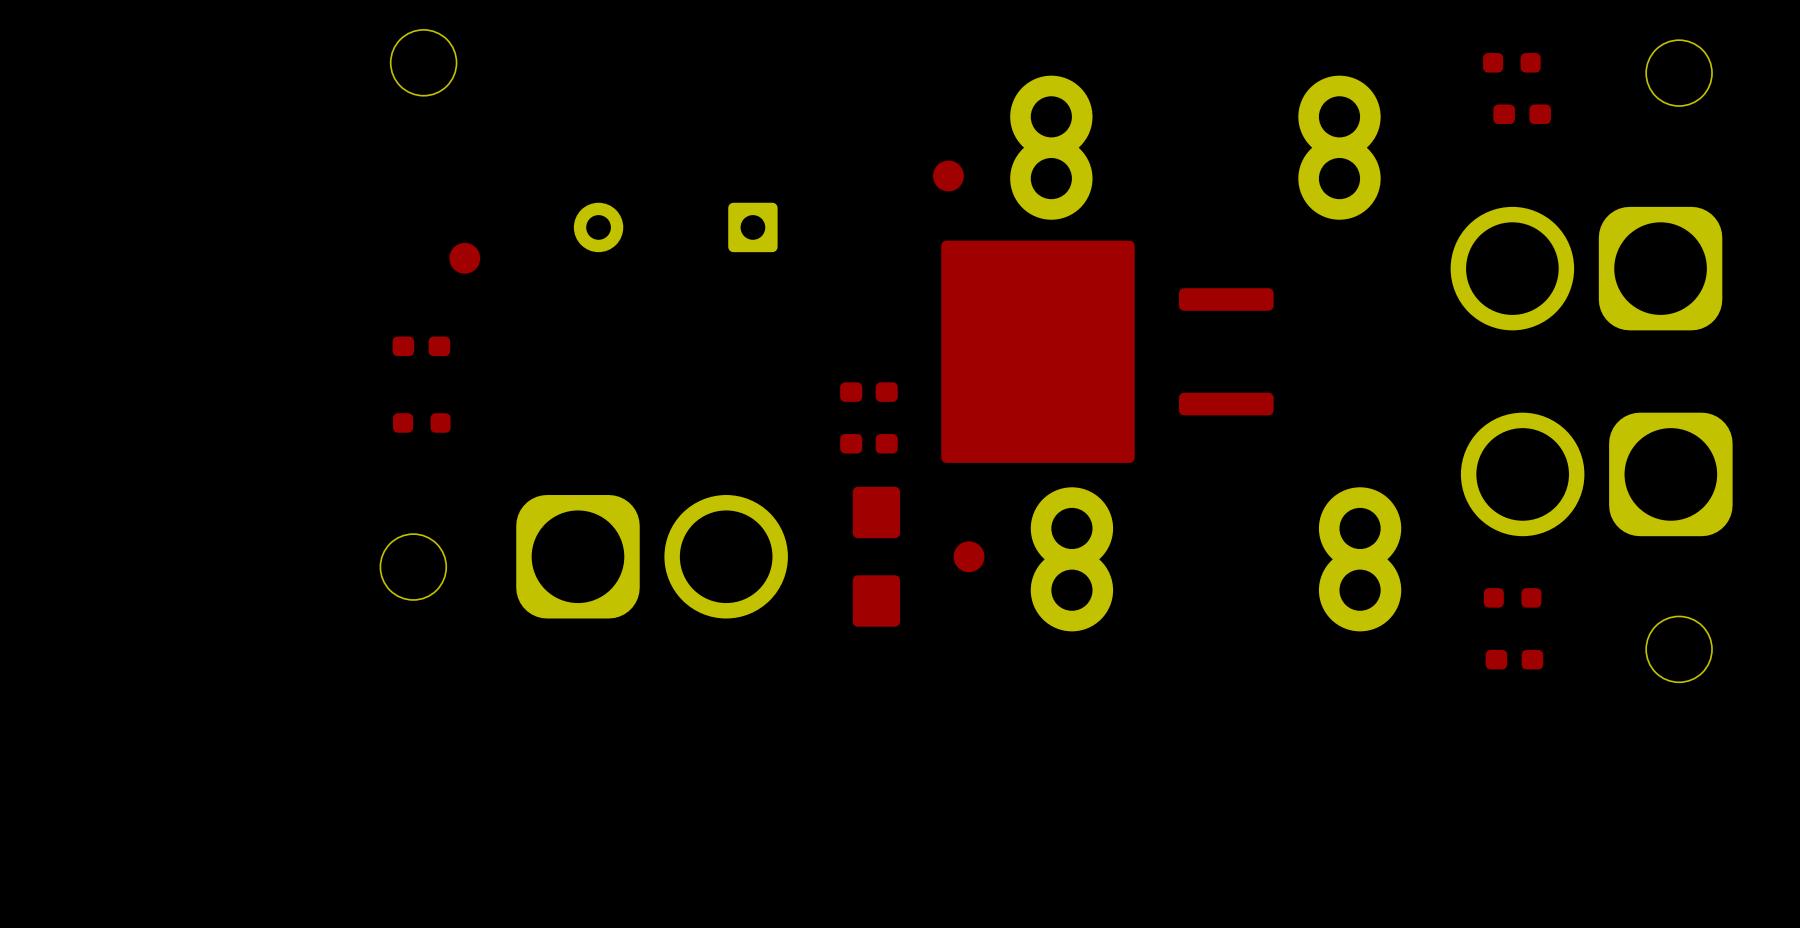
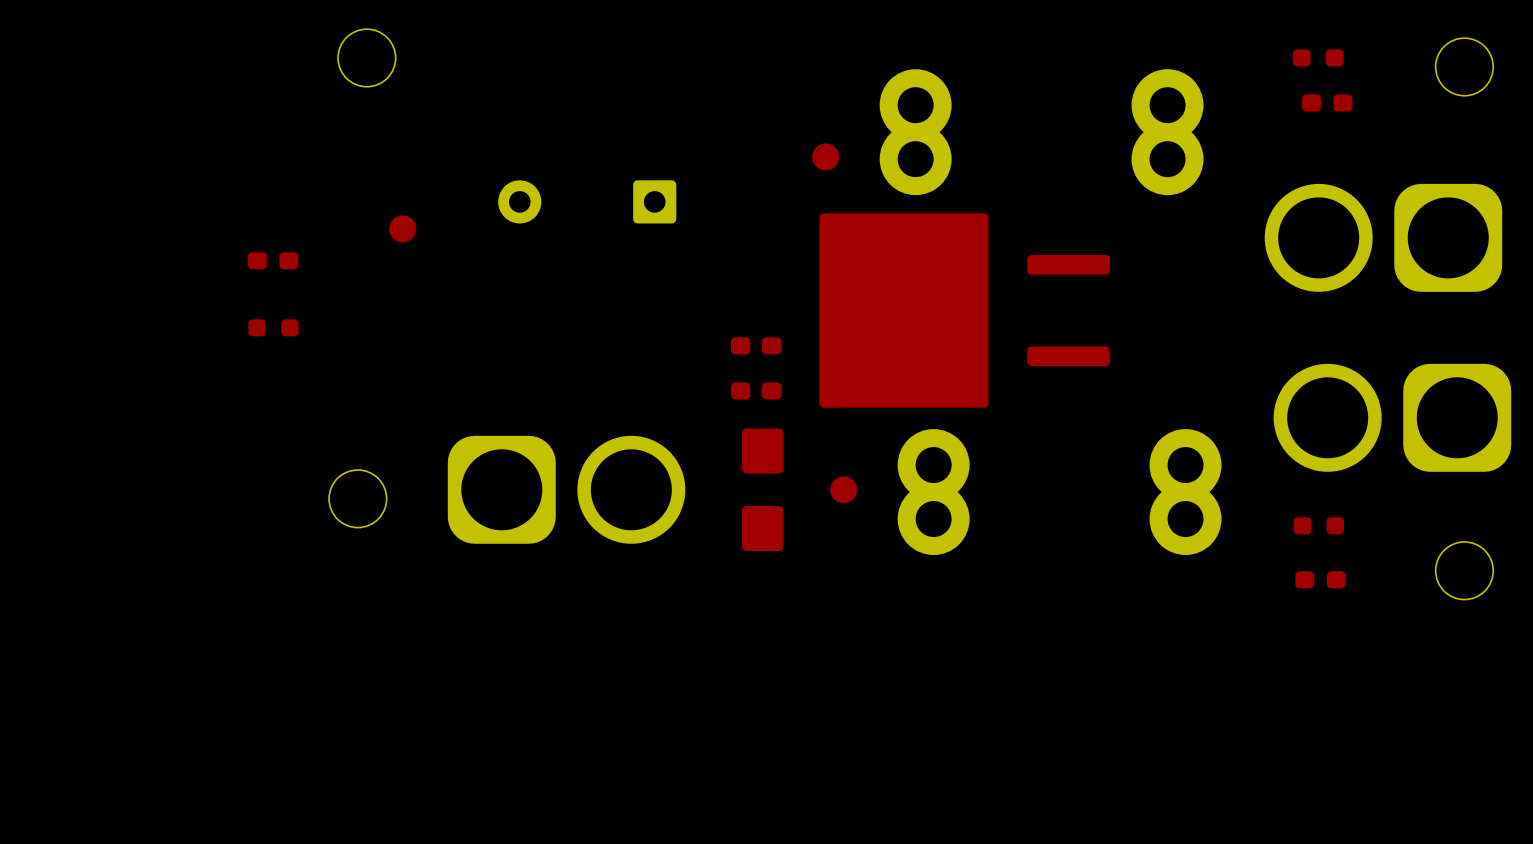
part position: (421, 346) -> (273, 260)
part position: (421, 422) -> (273, 327)

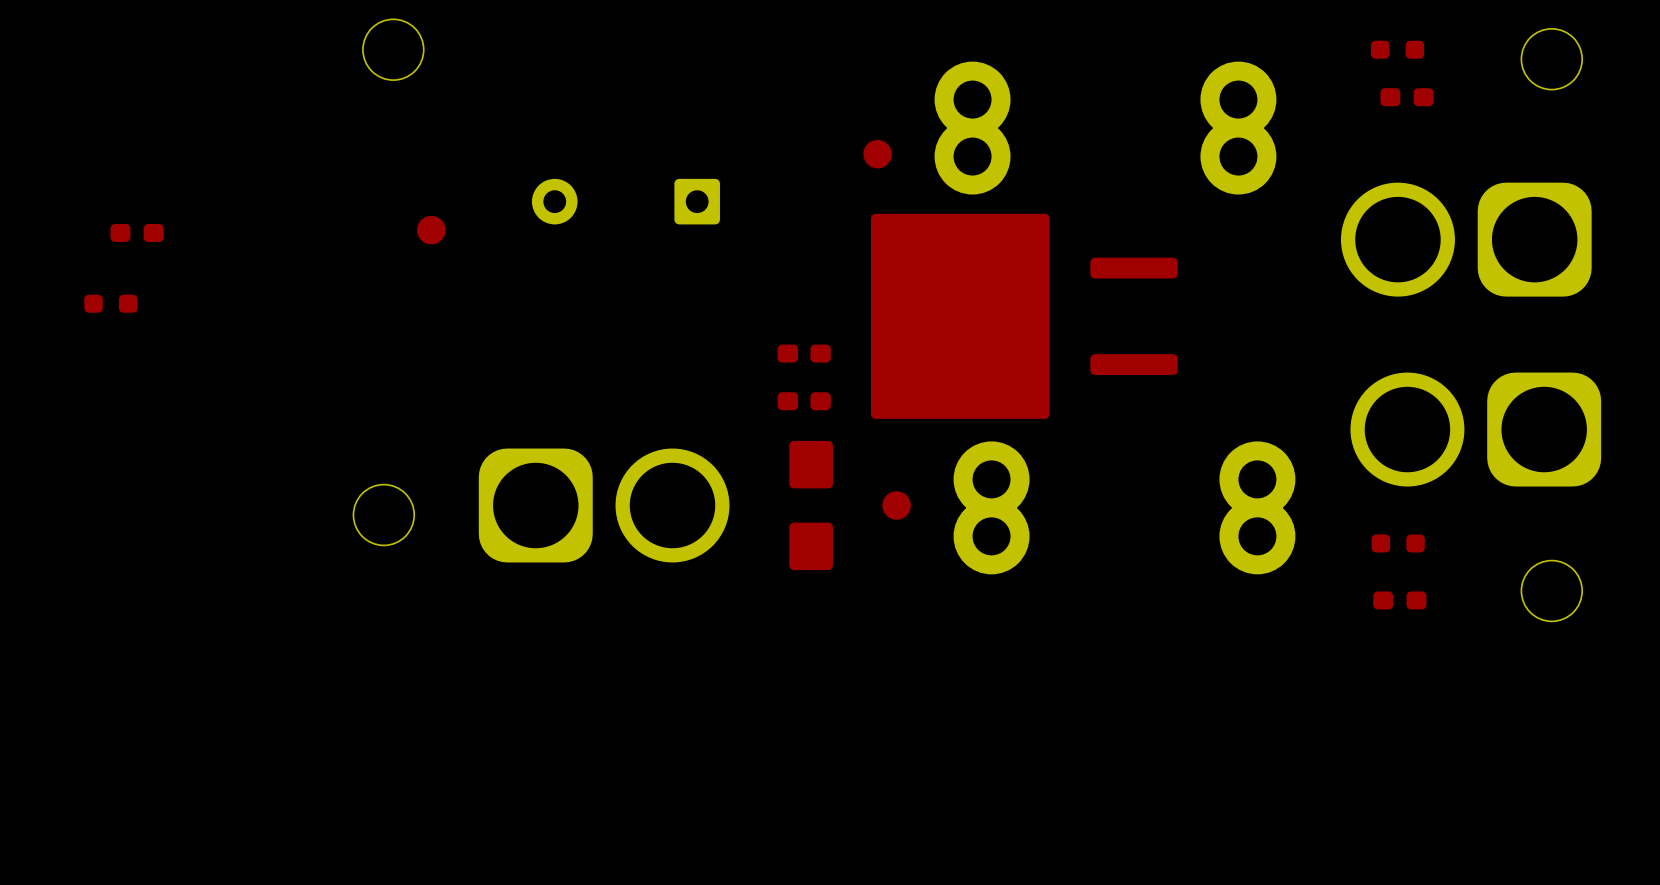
part position: (273, 260) -> (137, 232)
part position: (273, 327) -> (110, 303)

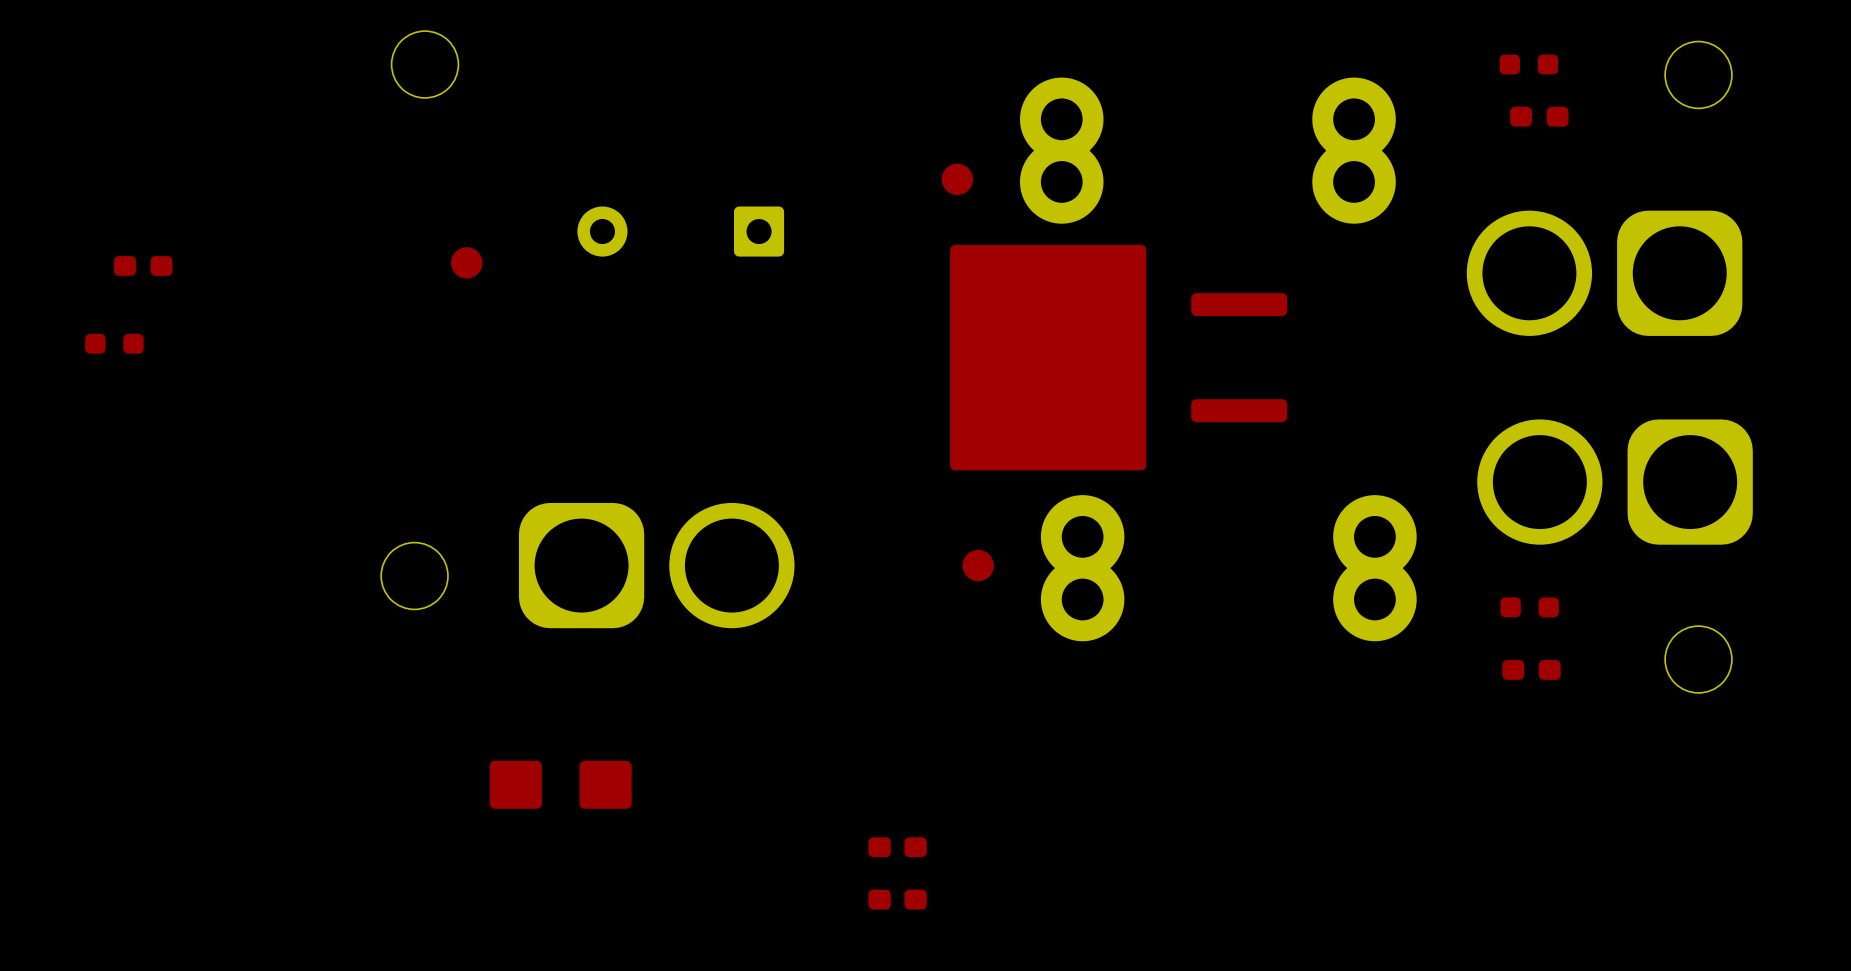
part: (804, 353) -> none
part: (804, 401) -> none
part rotation: 0° (811, 505) -> 90° clockwise (560, 784)
part position: (811, 505) -> (560, 784)
part: none -> (897, 847)
part: none -> (897, 899)

